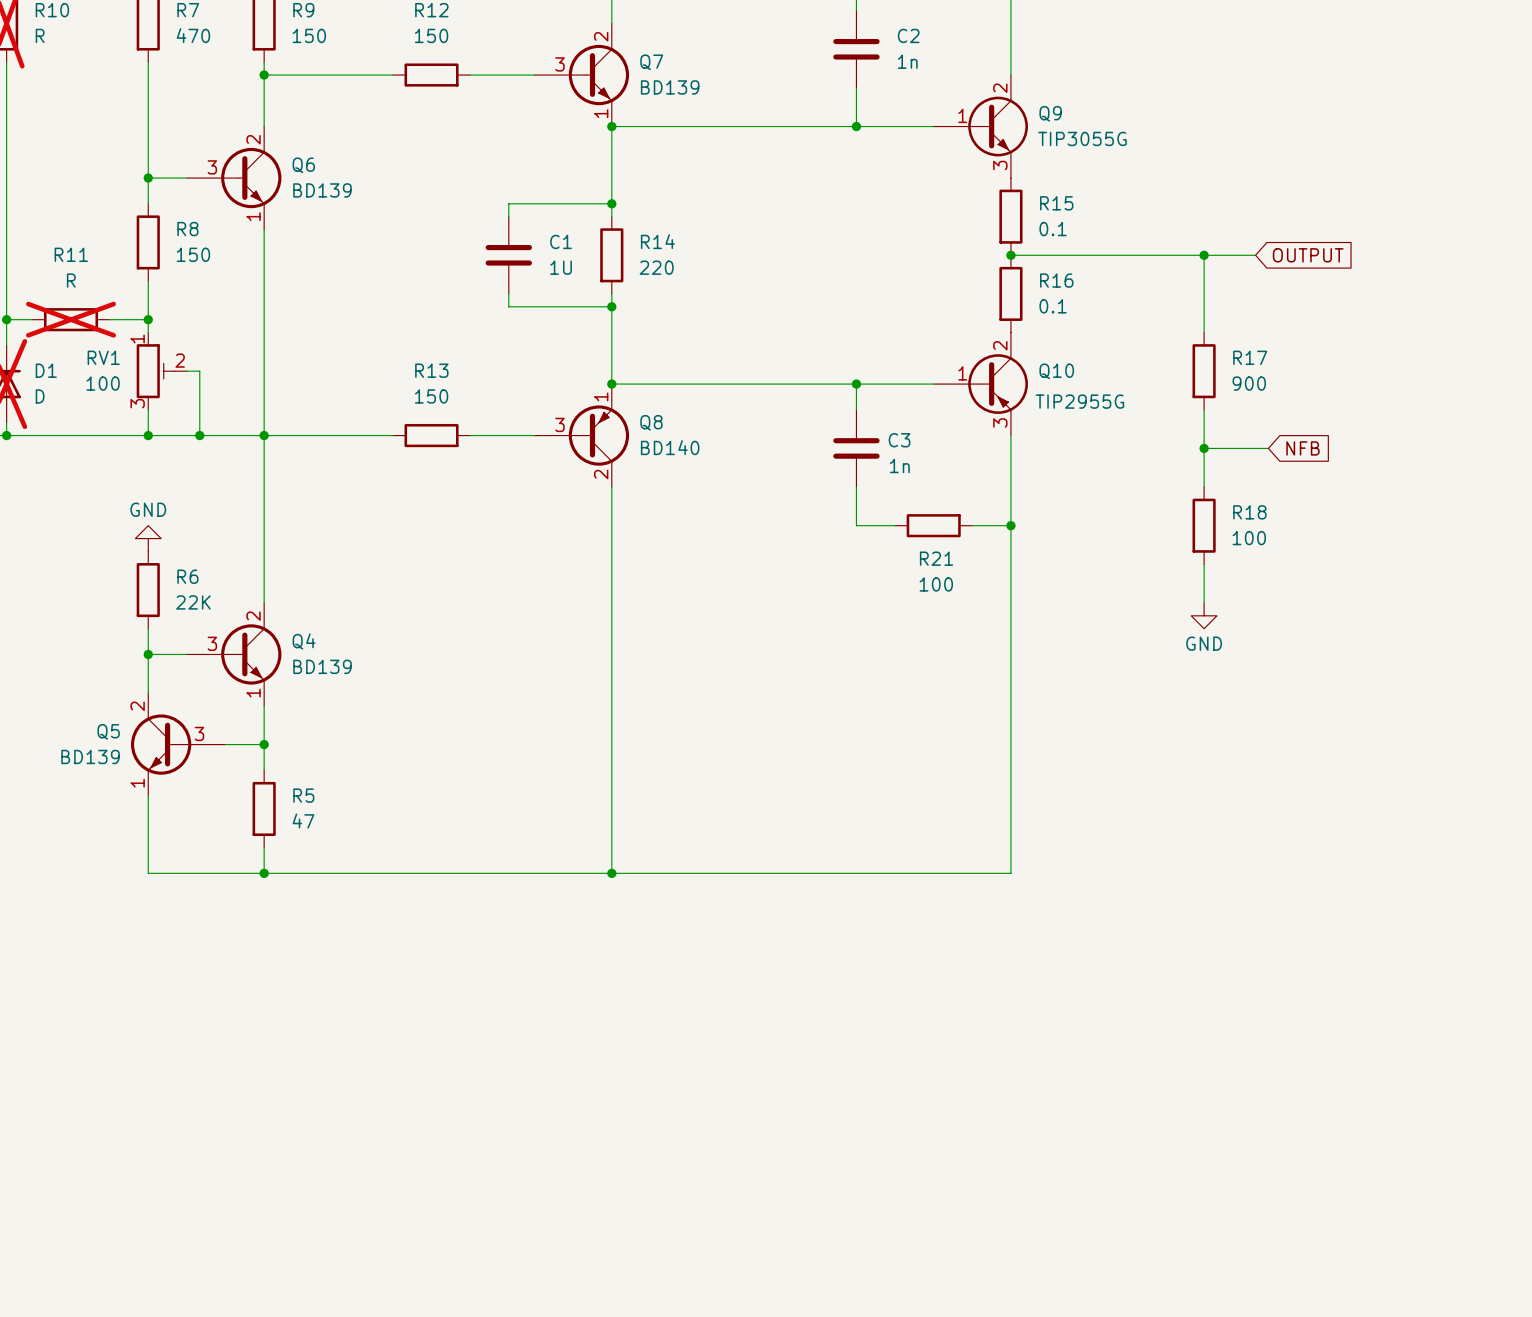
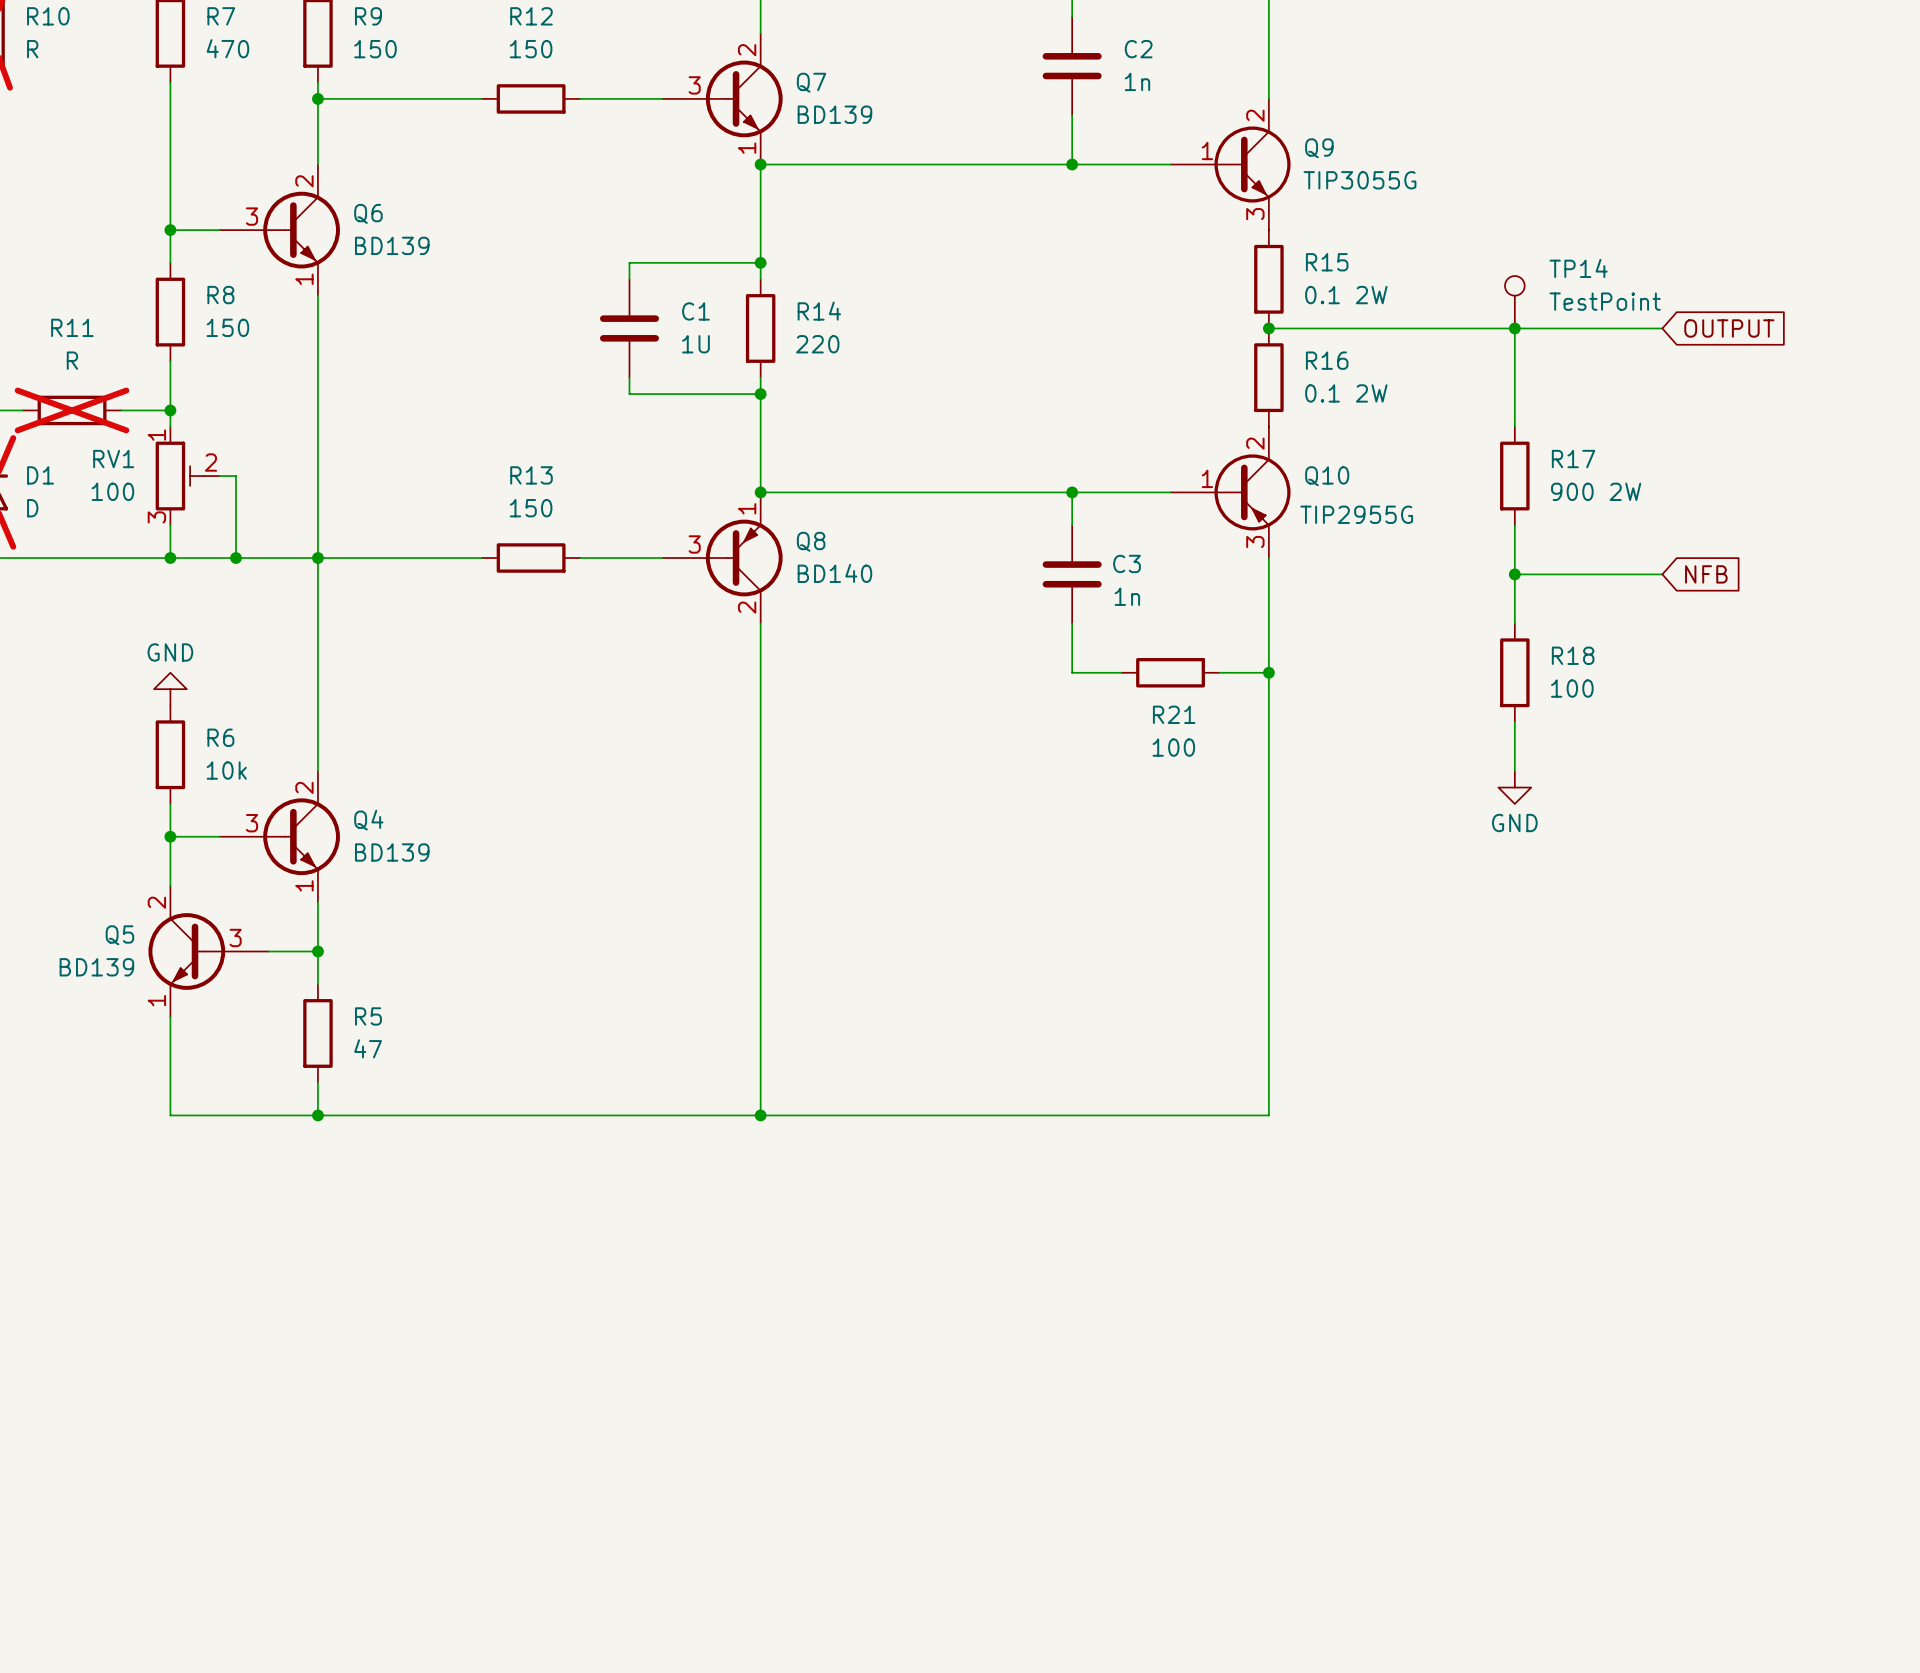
R15 value: 0.1 (1053, 229) -> 0.1 2W (1346, 295)
TP14: none -> TestPoint (1514, 302)
wire: none -> (1580, 328) (1662, 328)
global label position: OUTPUT (1308, 255) -> OUTPUT (1729, 328)
R16 value: 0.1 (1053, 306) -> 0.1 2W (1346, 393)
R17 value: 900 (1249, 383) -> 900 2W (1596, 491)
wire: none -> (1596, 574) (1662, 574)
global label position: NFB (1302, 448) -> NFB (1706, 574)
R6 value: 22K (193, 602) -> 10k (226, 770)

